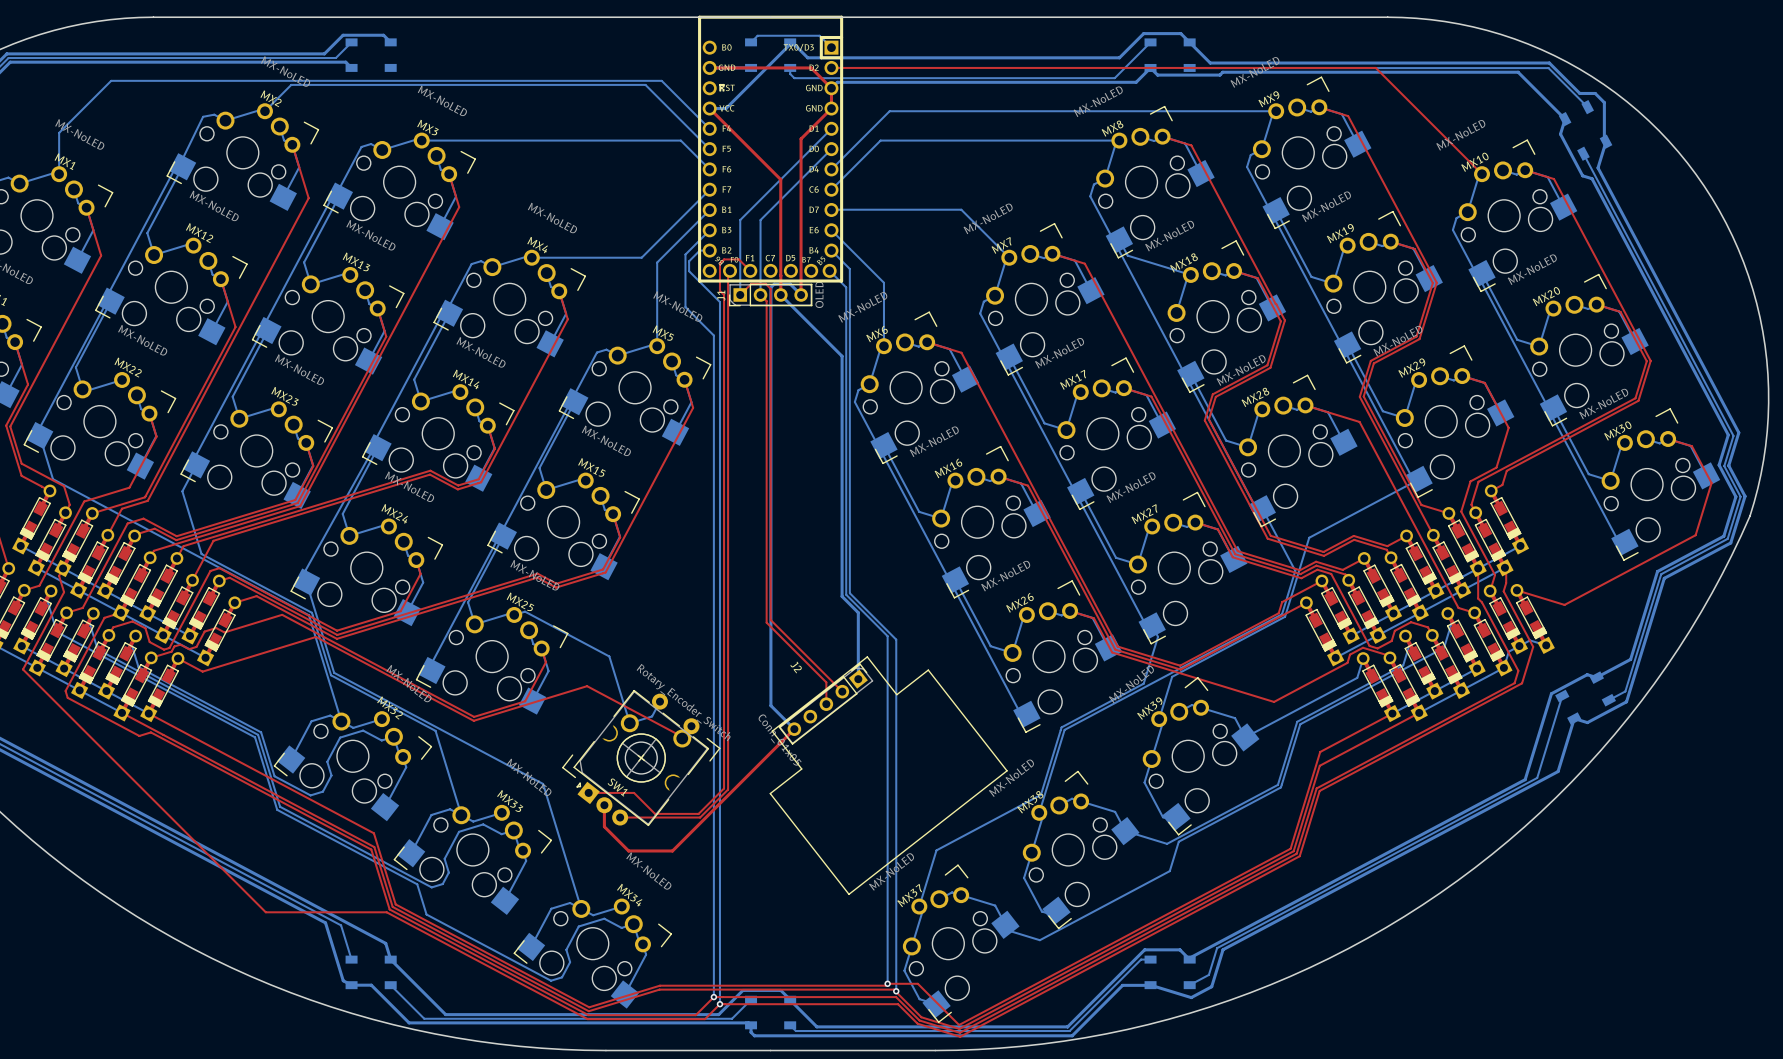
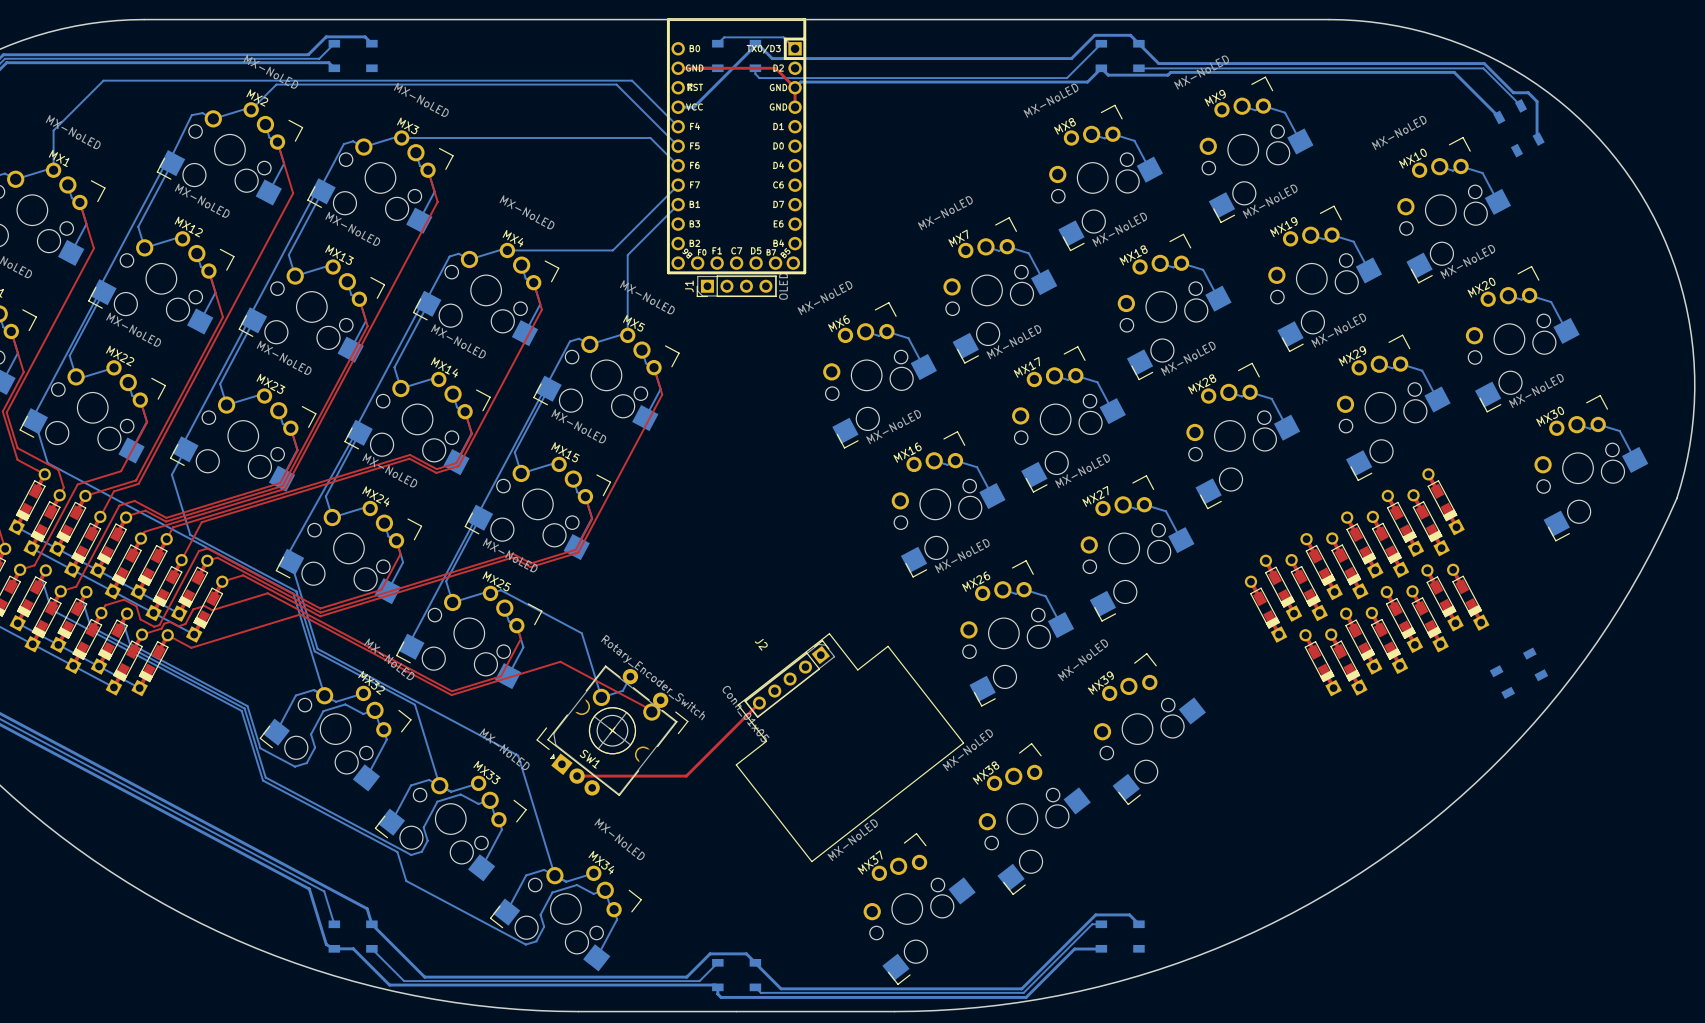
top track: (831, 67) (1375, 67) (1482, 174) -> none
top track: (1319, 107) (1348, 116) (1436, 282) (1419, 339) (1373, 363) (1363, 396) (1421, 505) (1448, 513) -> none
top track: (709, 108) (780, 179) (780, 275) -> none
top track: (831, 108) (801, 138) (801, 294) -> none
bottom track: (1565, 119) (1560, 134) (1582, 175) (1592, 178) (1728, 434) (1719, 465) (1735, 496) (1723, 536) (1657, 571) (1630, 659) (1596, 677) (1587, 674) (1551, 693) (1525, 779) (1189, 959) (1179, 949) -> (1138, 924) (1129, 914)
bottom track: (831, 128) (740, 220) (740, 294) -> none
top track: (1162, 136) (1191, 145) (1284, 320) (1270, 367) (1215, 396) (1208, 419) (1270, 535) (1323, 551) (1353, 535) (1387, 546) (1406, 535) -> none
bottom track: (1606, 141) (1598, 167) (1738, 432) (1728, 465) (1745, 496) (1730, 542) (1664, 578) (1626, 701) (1587, 722) (1574, 718) (1558, 771) (1223, 949) (1211, 986) (1191, 997) (1150, 985) -> none
bottom track: (831, 149) (760, 220) (760, 294) -> none
bottom track: (1583, 153) (1733, 435) (1724, 466) (1740, 496) (1727, 538) (1661, 574) (1625, 691) (1608, 700) -> none
bottom track: (831, 169) (889, 111) (1276, 111) (1273, 112) (1261, 149) (1250, 155) (1247, 167) (1269, 208) (1276, 210) -> none
top track: (1525, 170) (1554, 179) (1650, 360) (1638, 400) (1506, 470) (1502, 484) (1491, 490) -> none
bottom track: (1482, 174) (1478, 175) (1467, 212) (1456, 218) (1452, 229) (1474, 271) (1481, 273) -> none
bottom track: (831, 189) (880, 140) (1119, 140) (1116, 142) (1105, 178) (1093, 184) (1090, 196) (1112, 237) (1119, 239) -> none
bottom track: (831, 210) (961, 209) (1009, 257) (1006, 259) (995, 295) (983, 301) (980, 313) (1002, 354) (1009, 357) -> none
bottom track: (1276, 210) (1311, 276) (1333, 283) (1344, 247) (1347, 245) -> none
bottom track: (1276, 210) (1273, 217) (1340, 342) (1347, 344) -> none
bottom track: (709, 230) (685, 254) (685, 307) (713, 335) (713, 997) -> none
bottom track: (831, 230) (883, 282) (883, 346) (880, 347) (869, 384) (858, 390) (854, 402) (876, 443) (883, 445) -> none
bottom track: (1119, 239) (1127, 255) (1190, 274) (1187, 276) (1176, 312) -> none
bottom track: (1119, 239) (1117, 247) (1183, 372) (1190, 374) -> none
top track: (1390, 241) (1414, 249) (1432, 283) (1416, 336) (1370, 360) (1359, 396) (1433, 535) -> none
bottom track: (709, 250) (699, 250) (689, 261) (689, 271) (719, 302) (719, 1004) -> none
bottom track: (831, 250) (849, 268) (849, 593) (896, 639) (896, 991) -> none
top track: (1052, 253) (1084, 263) (1237, 551) (1300, 570) (1316, 561) (1342, 569) (1364, 558) -> none
top track: (750, 270) (738, 259) (724, 259) (719, 263) (719, 290) (724, 294) (724, 788) (698, 813) (655, 813) (634, 792) (588, 792) -> none
bottom track: (829, 270) (846, 287) (846, 594) (887, 636) (887, 983) -> none
top track: (1234, 271) (1257, 278) (1280, 321) (1267, 365) (1212, 394) (1204, 420) (1267, 538) (1323, 555) (1354, 539) (1386, 549) (1391, 557) -> none
top track: (728, 272) (728, 789) (700, 817) (620, 817) -> none
bottom track: (1481, 273) (1517, 339) (1539, 346) (1550, 310) (1553, 308) -> none
bottom track: (1481, 273) (1480, 279) (1547, 406) (1553, 407) -> none
top track: (780, 275) (780, 294) -> none
top track: (740, 294) (751, 283) (765, 283) (770, 288) (770, 620) (842, 691) -> none
top track: (760, 294) (766, 301) (766, 622) (826, 682) (826, 704) -> none
bottom track: (780, 294) (842, 356) (842, 596) (858, 612) (858, 679) -> none
bottom track: (801, 294) (790, 284) (774, 284) (770, 287) (770, 705) (794, 729) -> none
top track: (1596, 304) (1620, 311) (1646, 361) (1635, 398) (1478, 481) (1471, 504) (1475, 512) -> none
top track: (927, 342) (961, 352) (1117, 646) (1180, 665) (1278, 613) (1282, 602) (1321, 580) -> none
bottom track: (1347, 344) (1382, 411) (1404, 417) (1415, 381) (1419, 380) -> none
bottom track: (1347, 344) (1345, 352) (1411, 477) (1419, 479) (1309, 537) (1285, 616) (1172, 676) (1159, 719) (1162, 724) (1144, 782) (1163, 817) (1171, 819) (1176, 816) -> none
bottom track: (1009, 357) (1044, 423) (1066, 430) (1077, 393) (1080, 392) -> none
bottom track: (1009, 357) (1007, 364) (1073, 489) (1080, 491) -> none
bottom track: (1190, 374) (1226, 440) (1248, 447) (1259, 411) (1262, 409) -> none
bottom track: (1190, 374) (1188, 381) (1255, 506) (1262, 508) (1295, 570) (1282, 614) (1064, 729) (1039, 812) (1042, 818) (1024, 878) (1041, 911) (1050, 914) (1056, 910) -> none
top track: (1462, 376) (1484, 382) (1508, 427) (1496, 467) (1470, 481) (1461, 511) (1495, 575) (1490, 591) -> none
top track: (1123, 388) (1151, 396) (1235, 554) (1300, 574) (1316, 565) (1345, 574) (1348, 580) -> none
top track: (1305, 405) (1359, 421) (1458, 607) (1474, 612) -> none
bottom track: (1553, 407) (1588, 474) (1610, 480) (1621, 444) (1624, 442) -> none
bottom track: (1553, 407) (1551, 415) (1617, 540) (1624, 542) -> none
top track: (1668, 438) (1692, 446) (1711, 483) (1695, 535) (1564, 604) (1516, 590) -> none
bottom track: (883, 445) (919, 511) (941, 518) (952, 482) (955, 480) -> none
bottom track: (883, 445) (881, 452) (948, 577) (955, 579) -> none
top track: (998, 476) (1028, 485) (1115, 649) (1180, 669) (1306, 602) -> none
bottom track: (1080, 491) (1115, 557) (1137, 564) (1149, 528) (1152, 526) -> none
bottom track: (1080, 491) (1078, 498) (1145, 623) (1152, 625) (1158, 636) (1143, 683) (1061, 727) (1040, 794) (936, 850) (919, 906) (922, 912) (904, 970) (919, 999) (936, 1004) -> none
top track: (1195, 522) (1217, 529) (1232, 557) (1301, 578) (1317, 569) (1331, 573) (1369, 645) (1377, 648) (1391, 640) (1394, 630) (1411, 622) (1428, 627) (1432, 635) -> none
bottom track: (1520, 545) (1351, 635) -> none
top track: (1504, 567) (1506, 583) (1503, 591) (1533, 646) (1522, 683) (1319, 790) (1299, 856) (960, 1036) (917, 1023) (898, 1004) (719, 1004) (705, 1019) (587, 1019) (386, 912) (265, 912) (23, 669) (64, 592) (59, 575) (63, 568) -> none
bottom track: (1504, 567) (1335, 657) -> none
top track: (1478, 568) (1478, 598) (1518, 670) (1514, 683) (1316, 788) (1296, 853) (959, 1032) (919, 1020) (896, 997) (713, 997) (695, 1015) (588, 1015) (389, 909) (371, 849) (150, 732) (139, 735) (67, 697) (65, 690) (104, 617) (120, 612) -> none
bottom track: (955, 579) (990, 646) (1012, 652) (1023, 616) (1026, 614) -> none
bottom track: (955, 579) (953, 587) (1019, 712) (1026, 714) -> none
top track: (1070, 611) (1094, 618) (1112, 652) (1274, 701) (1347, 662) (1350, 654) (1362, 647) (1388, 655) (1389, 657) -> none
bottom track: (1447, 613) (1452, 621) (1444, 647) (1300, 724) (1280, 787) (1178, 841) (1169, 871) (1039, 940) (1008, 930) (995, 905) (952, 892) (939, 899) -> none
bottom track: (1405, 636) (1409, 644) (1403, 665) (1297, 721) (1277, 784) (1167, 843) (1125, 831) (1115, 811) (1072, 798) (1059, 805) -> none
bottom track: (1546, 645) (1530, 640) (1508, 651) (1503, 667) (1419, 712) -> none
bottom track: (1363, 658) (1357, 677) (1245, 737) (1235, 718) (1192, 705) (1179, 711) -> none
bottom track: (1477, 668) (1392, 713) -> none
bottom track: (1562, 696) (1537, 777) (1217, 948) (1208, 974) (1189, 985) -> none
top track: (121, 712) (374, 847) (392, 906) (588, 1011) (659, 989) (893, 989) (921, 1017) (959, 1028) (1293, 851) (1319, 765) (1419, 712) -> none
top track: (148, 713) (373, 833) (395, 904) (589, 1007) (659, 985) (885, 985) (887, 983) (917, 983) (959, 1025) (1290, 848) (1320, 751) (1392, 713) -> none
top track: (604, 805) (604, 826) (628, 850) (672, 850) (718, 805) -> (577, 776) (686, 776)
via: (887, 983) -> none
via: (896, 991) -> none
via: (713, 997) -> none
via: (719, 1004) -> none

